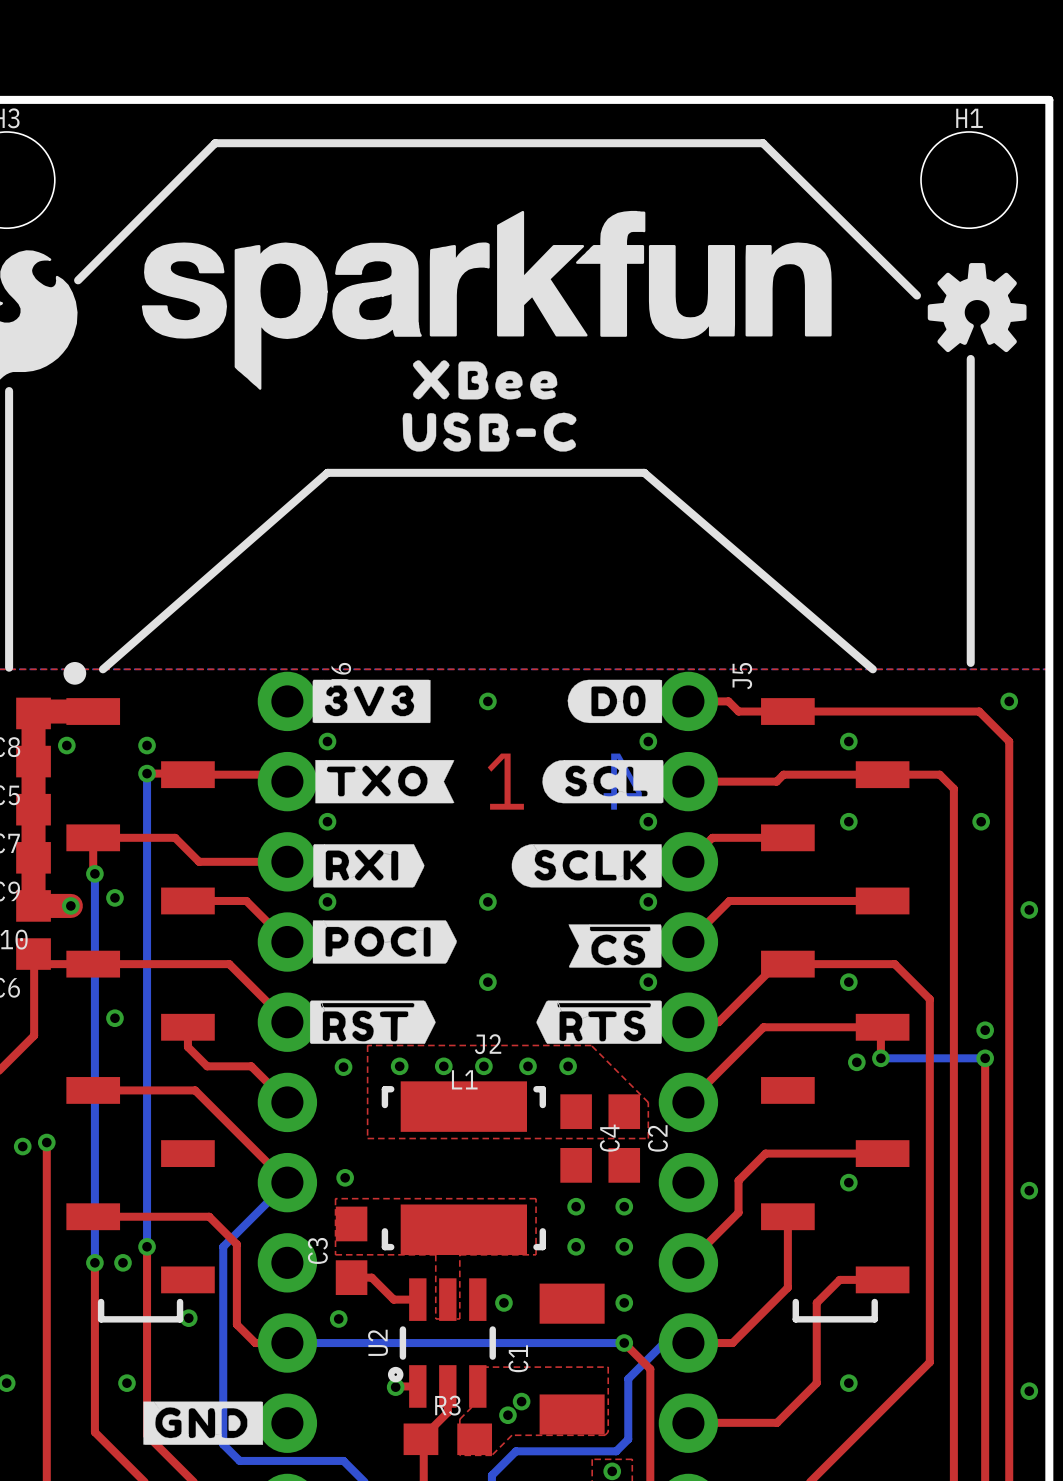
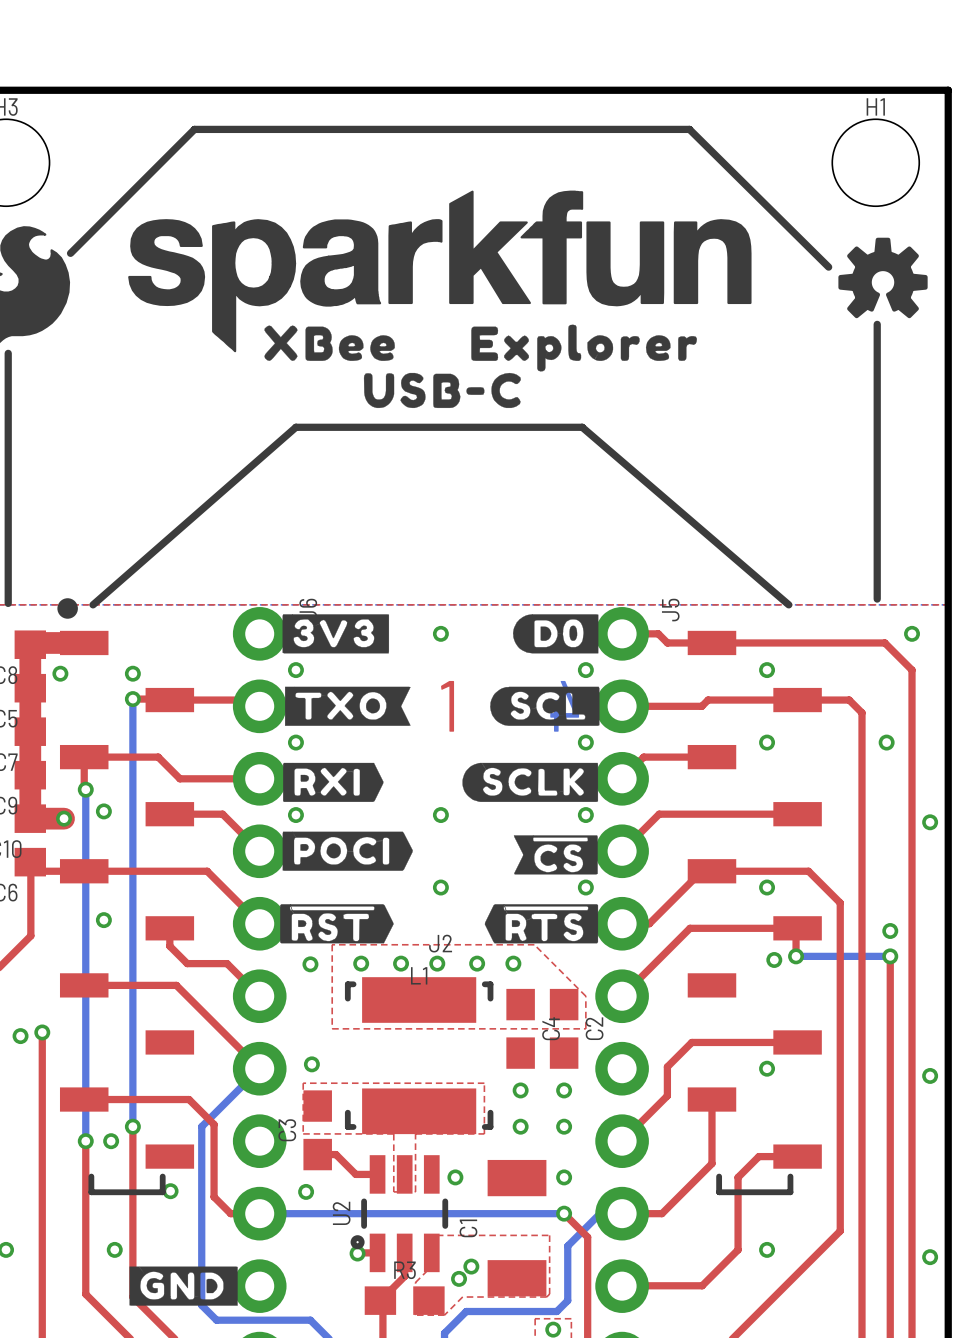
drawing: none -> [471, 324, 698, 372]
drawing position: (485, 379) -> (329, 343)

